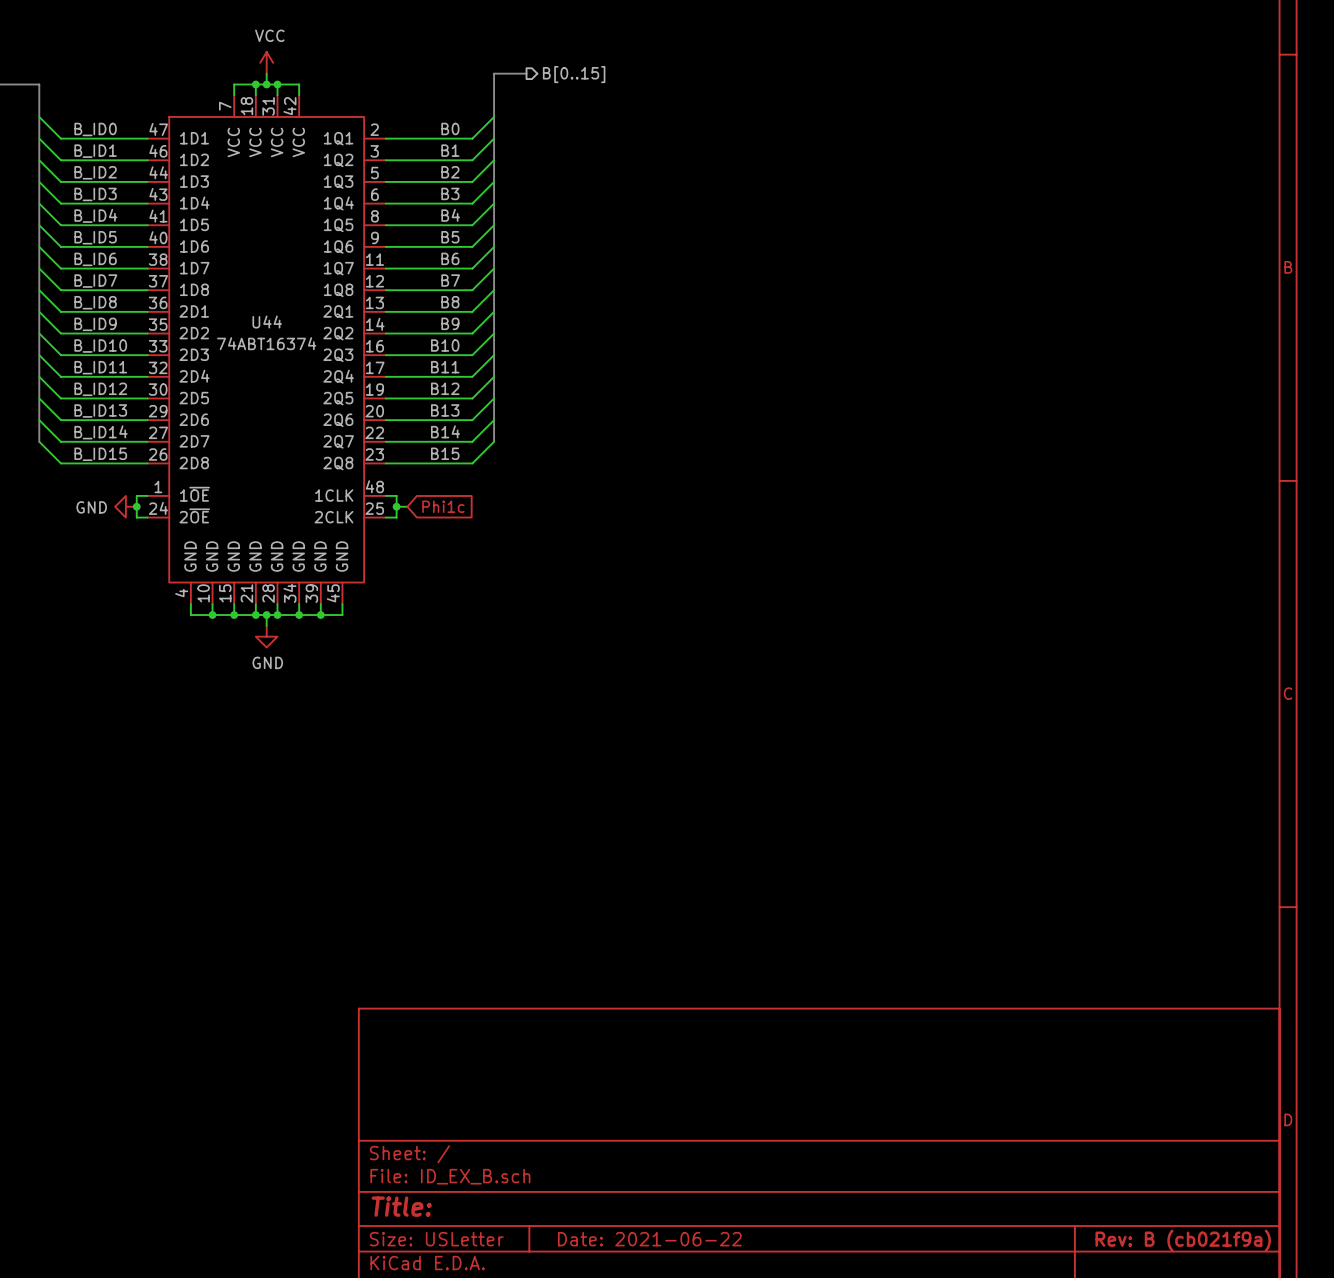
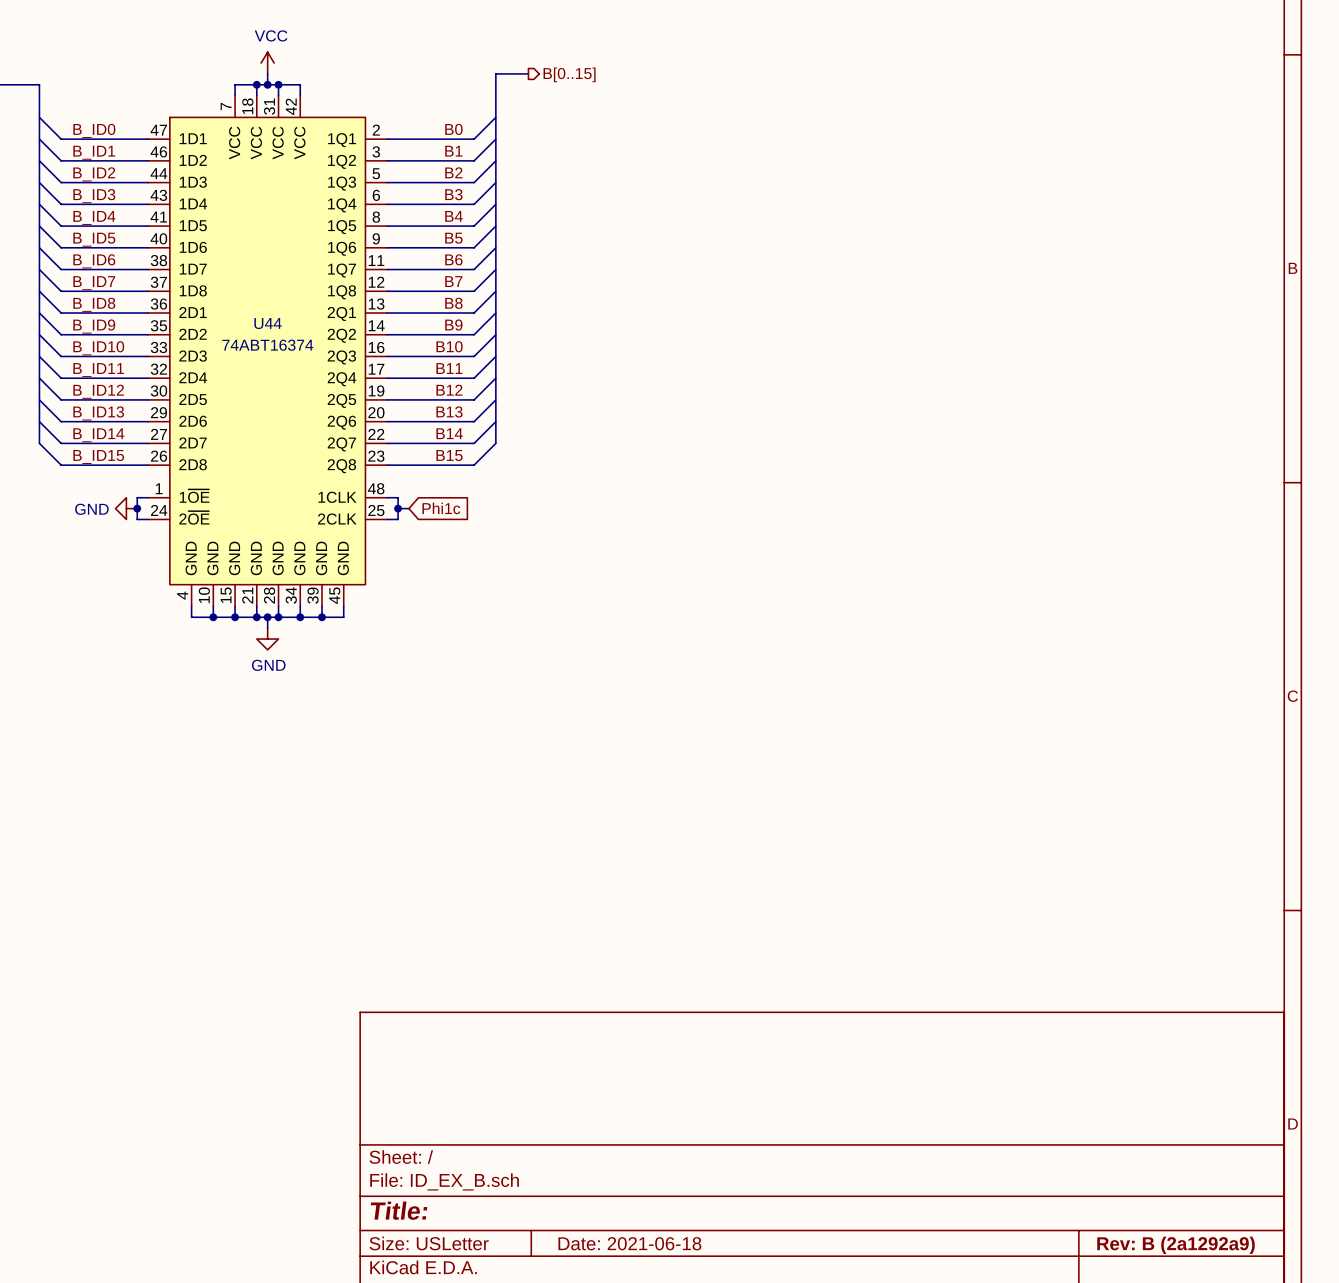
title block: Date: 2021-06-22 (649, 1239) -> Date: 2021-06-18 (629, 1243)
title block: Rev: B (cb021f9a) (1183, 1240) -> Rev: B (2a1292a9) (1176, 1245)

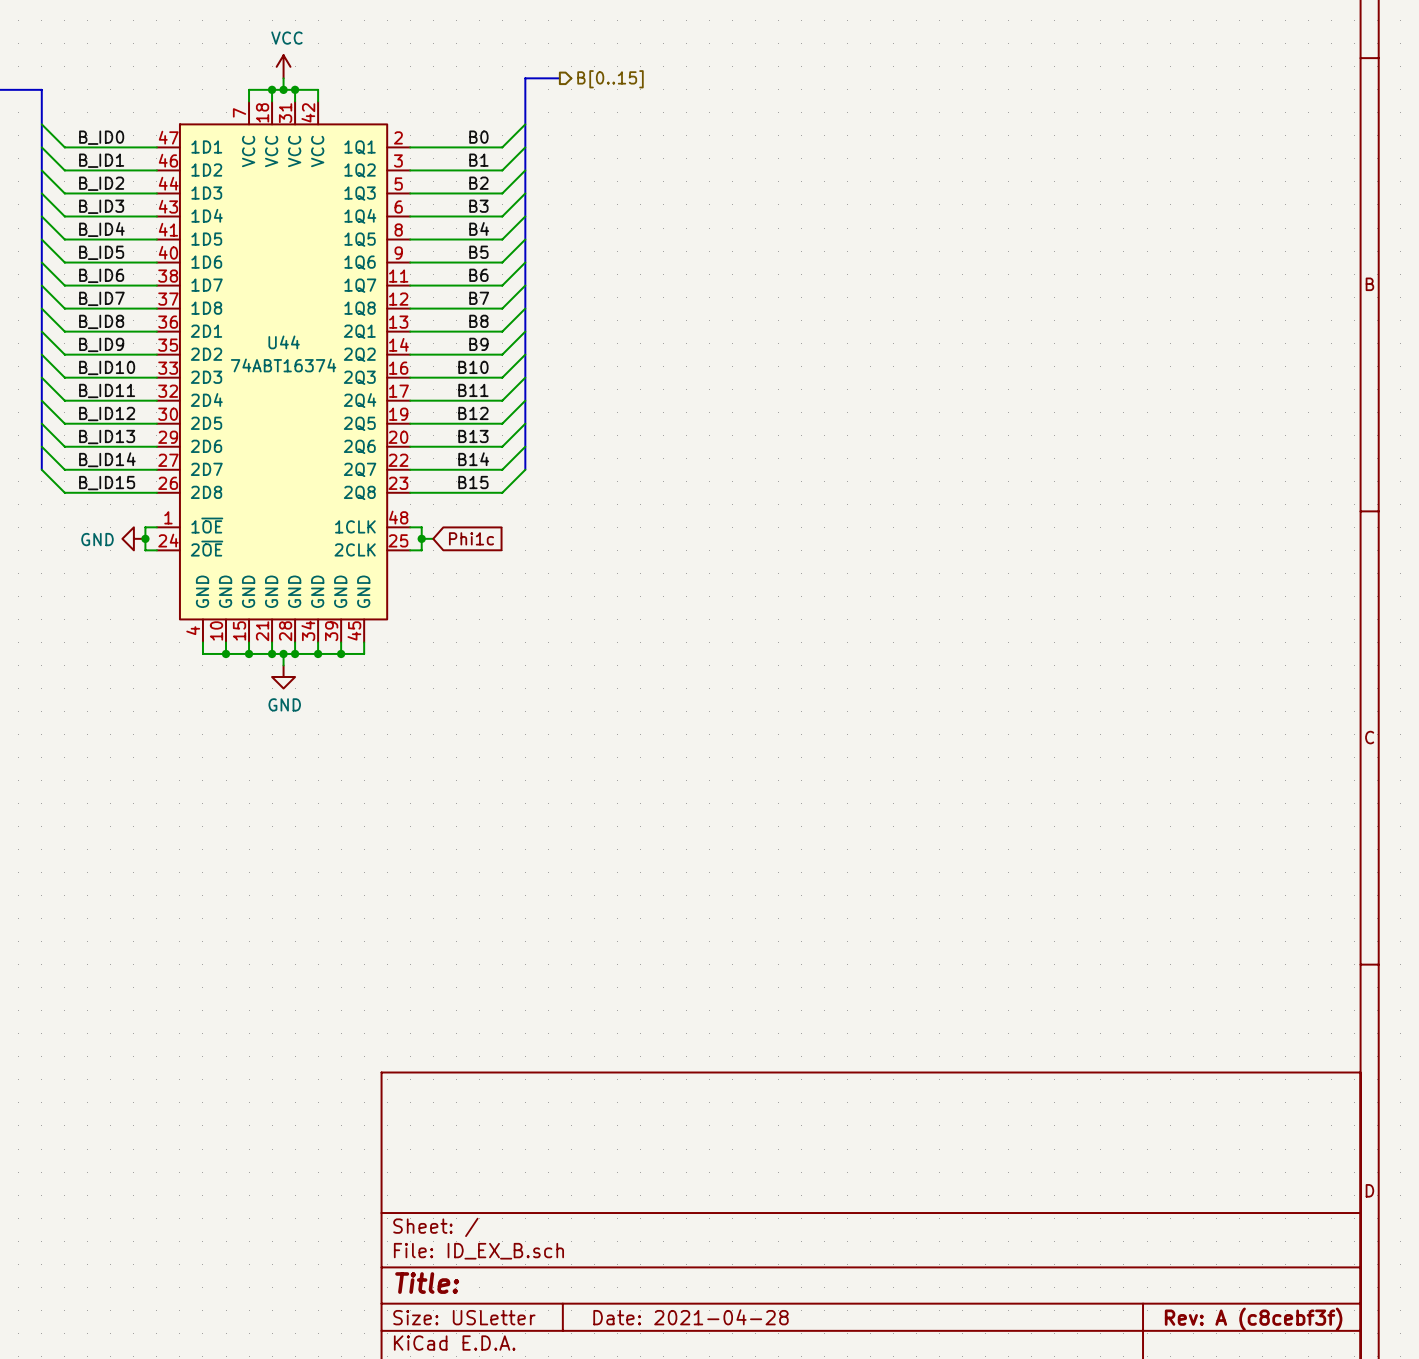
title block: Date: 2021-06-18 (629, 1243) -> Date: 2021-04-28 (691, 1317)
title block: Rev: B (2a1292a9) (1176, 1245) -> Rev: A (c8cebf3f) (1253, 1319)

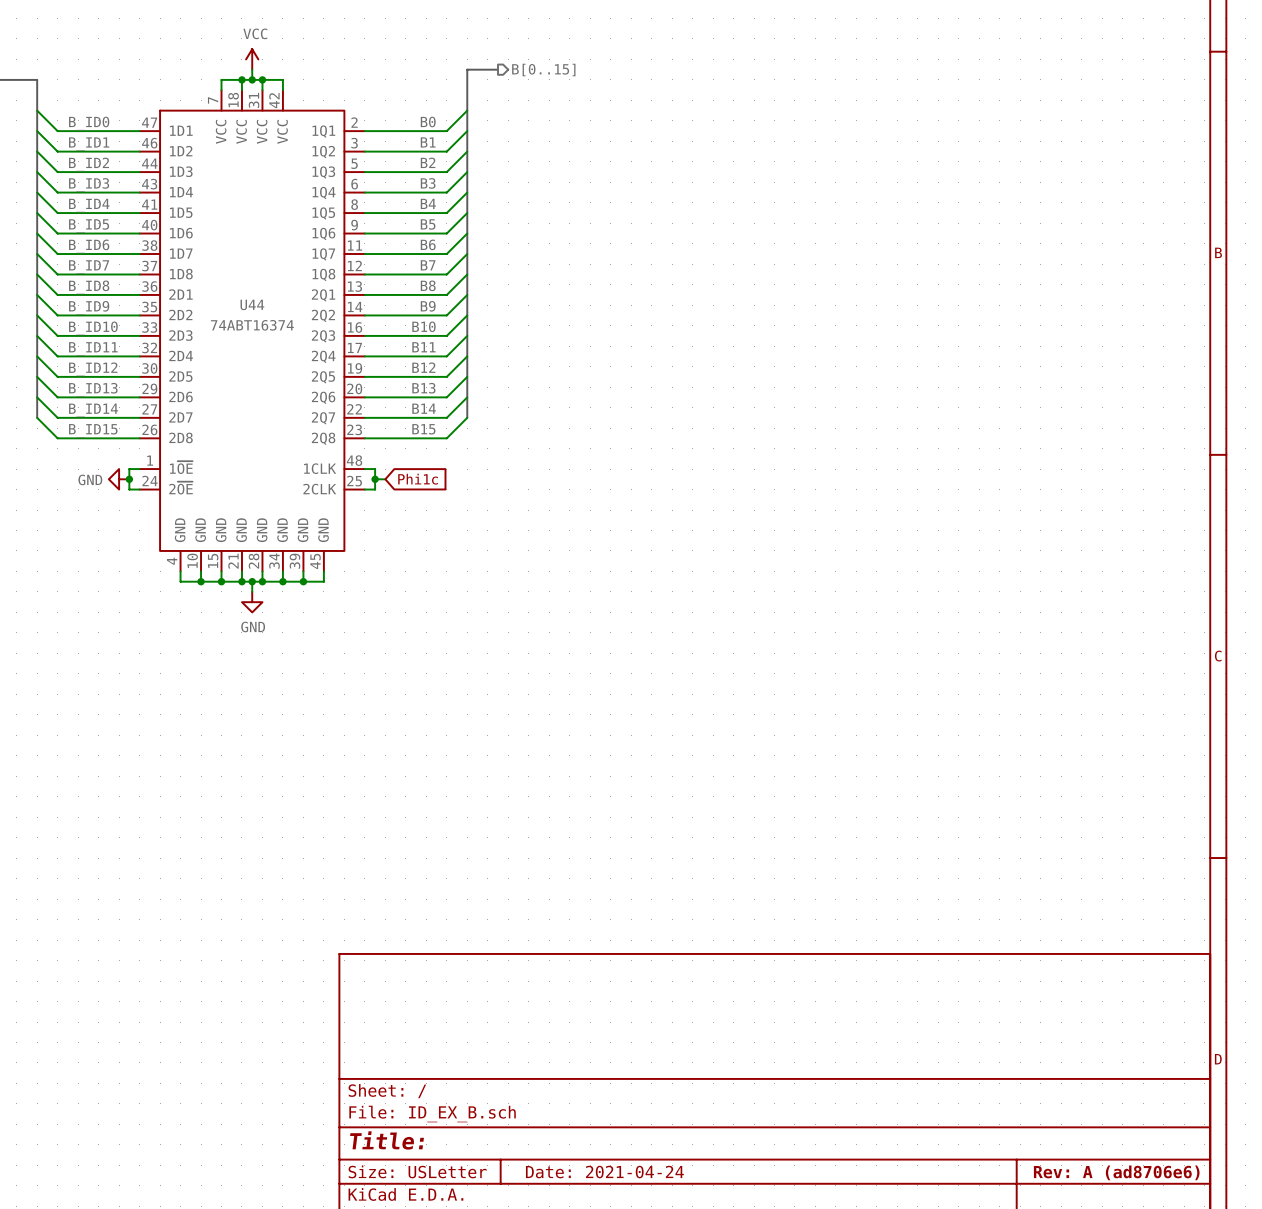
title block: Date: 2021-04-28 (691, 1317) -> Date: 2021-04-24 (604, 1172)
title block: Rev: A (c8cebf3f) (1253, 1319) -> Rev: A (ad8706e6) (1116, 1172)

